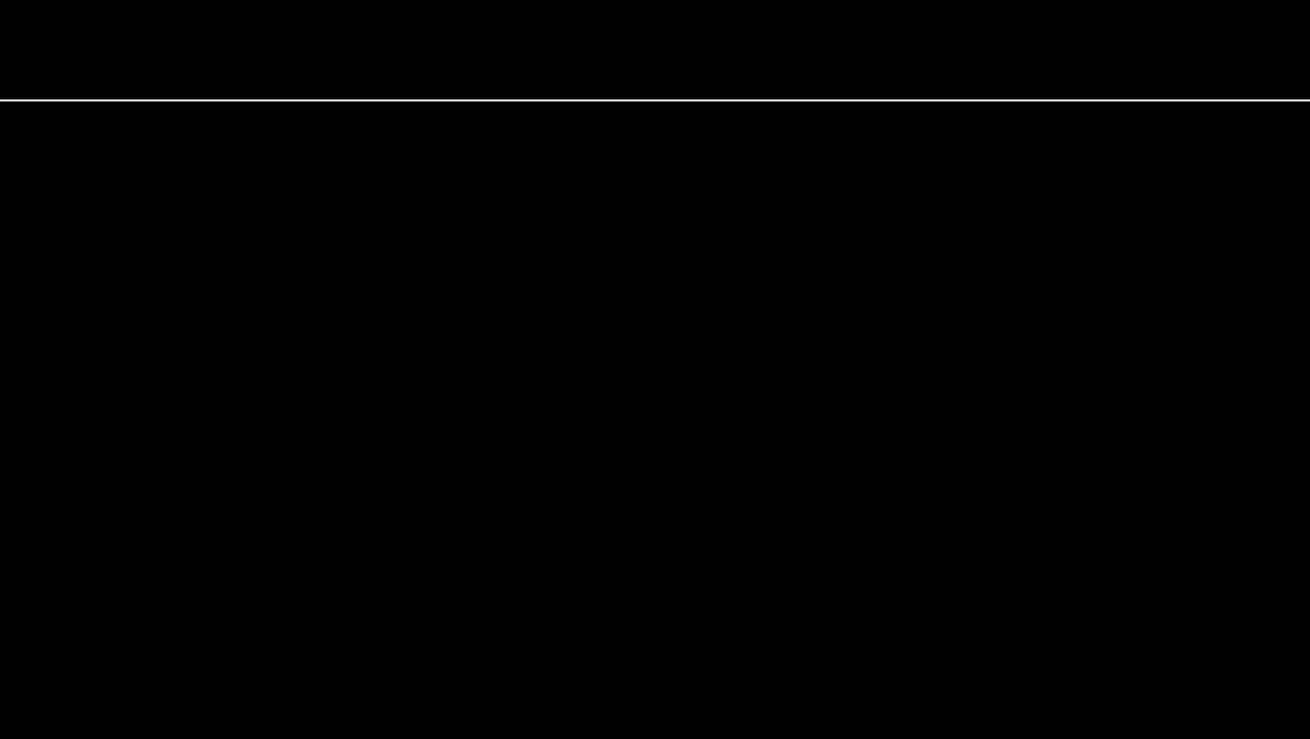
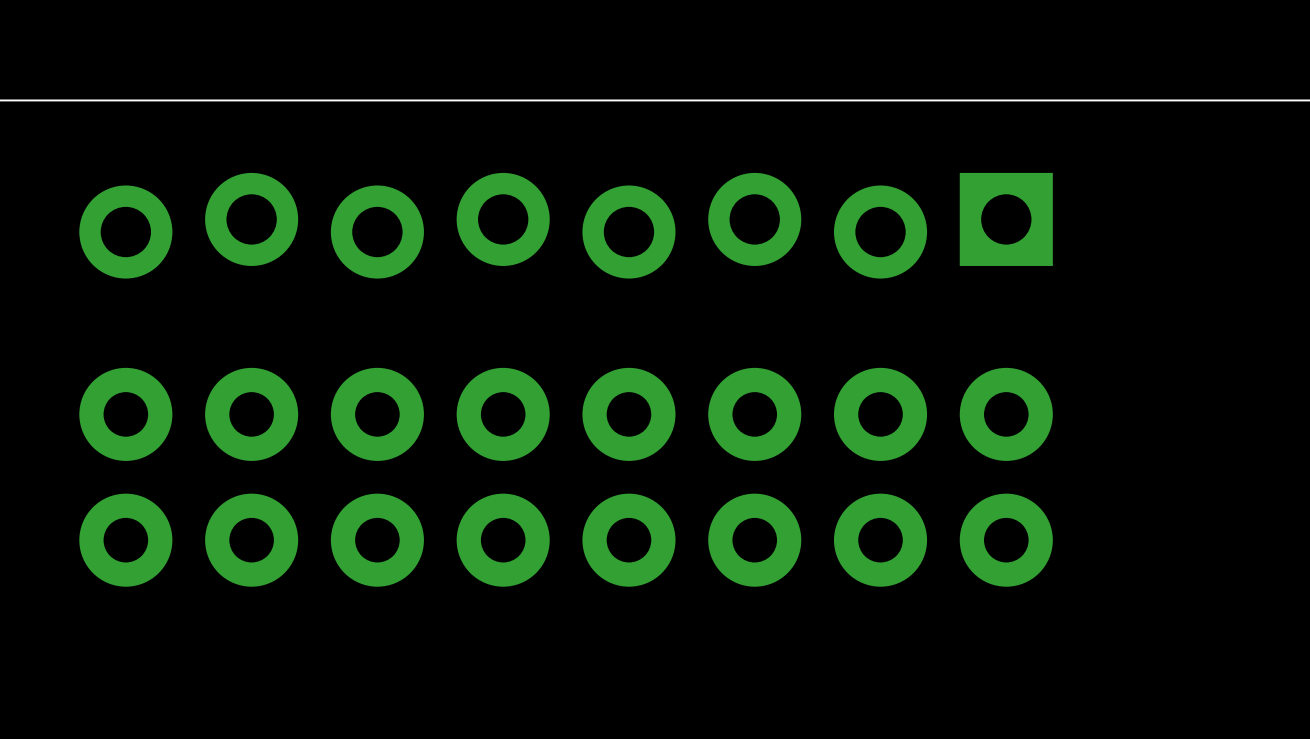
part: none -> (566, 225)
part: none -> (125, 477)
part: none -> (251, 477)
part: none -> (377, 477)
part: none -> (503, 477)
part: none -> (628, 477)
part: none -> (754, 477)
part: none -> (880, 477)
part: none -> (1006, 477)

